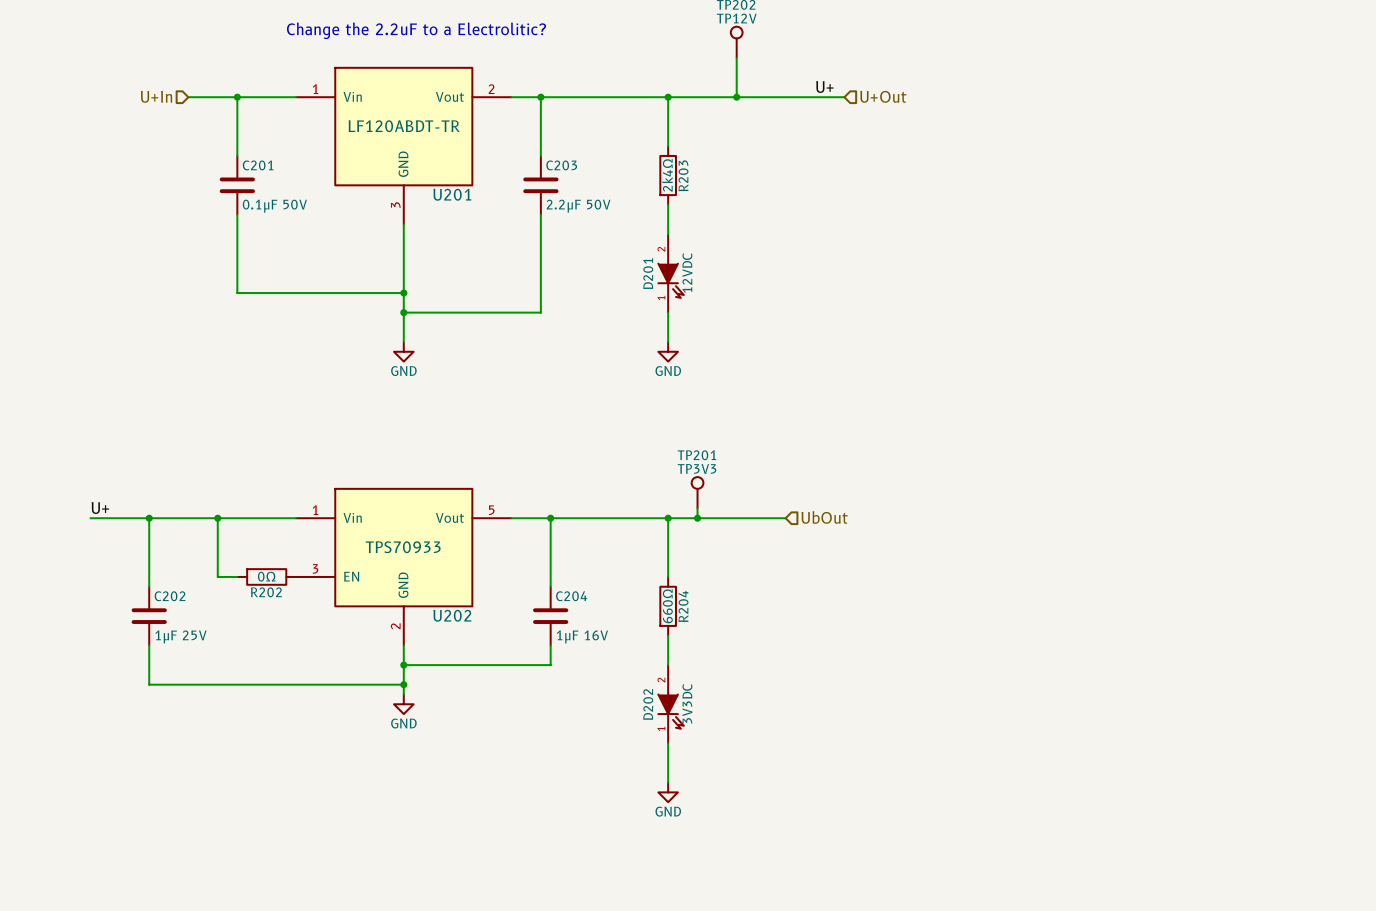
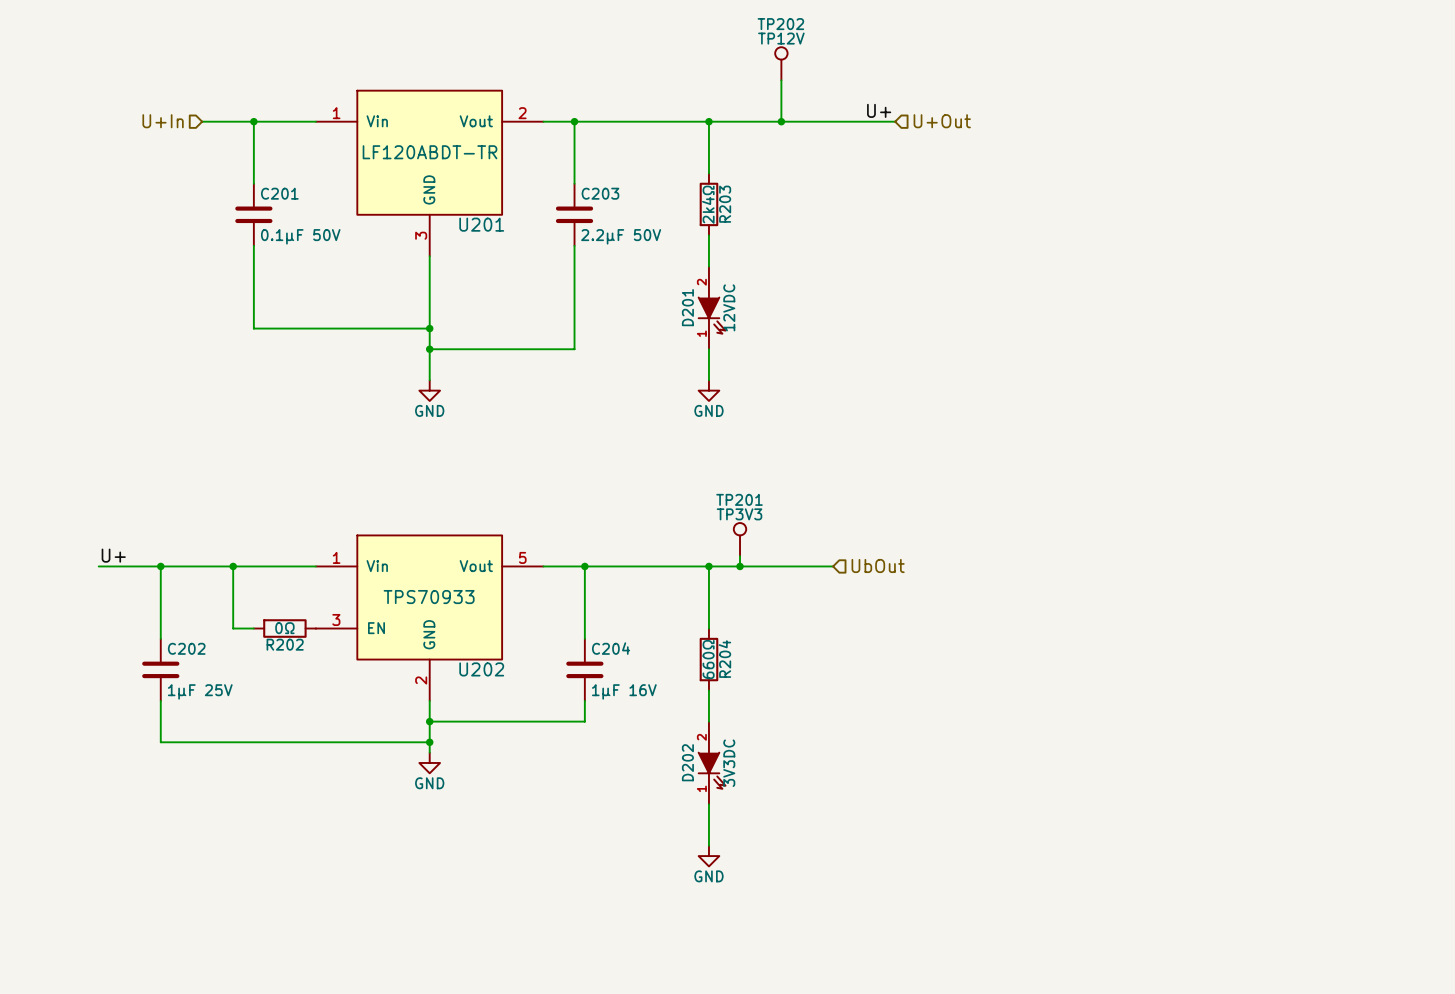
text: Change the 2.2uF to a Electrolitic? (416, 30) -> none

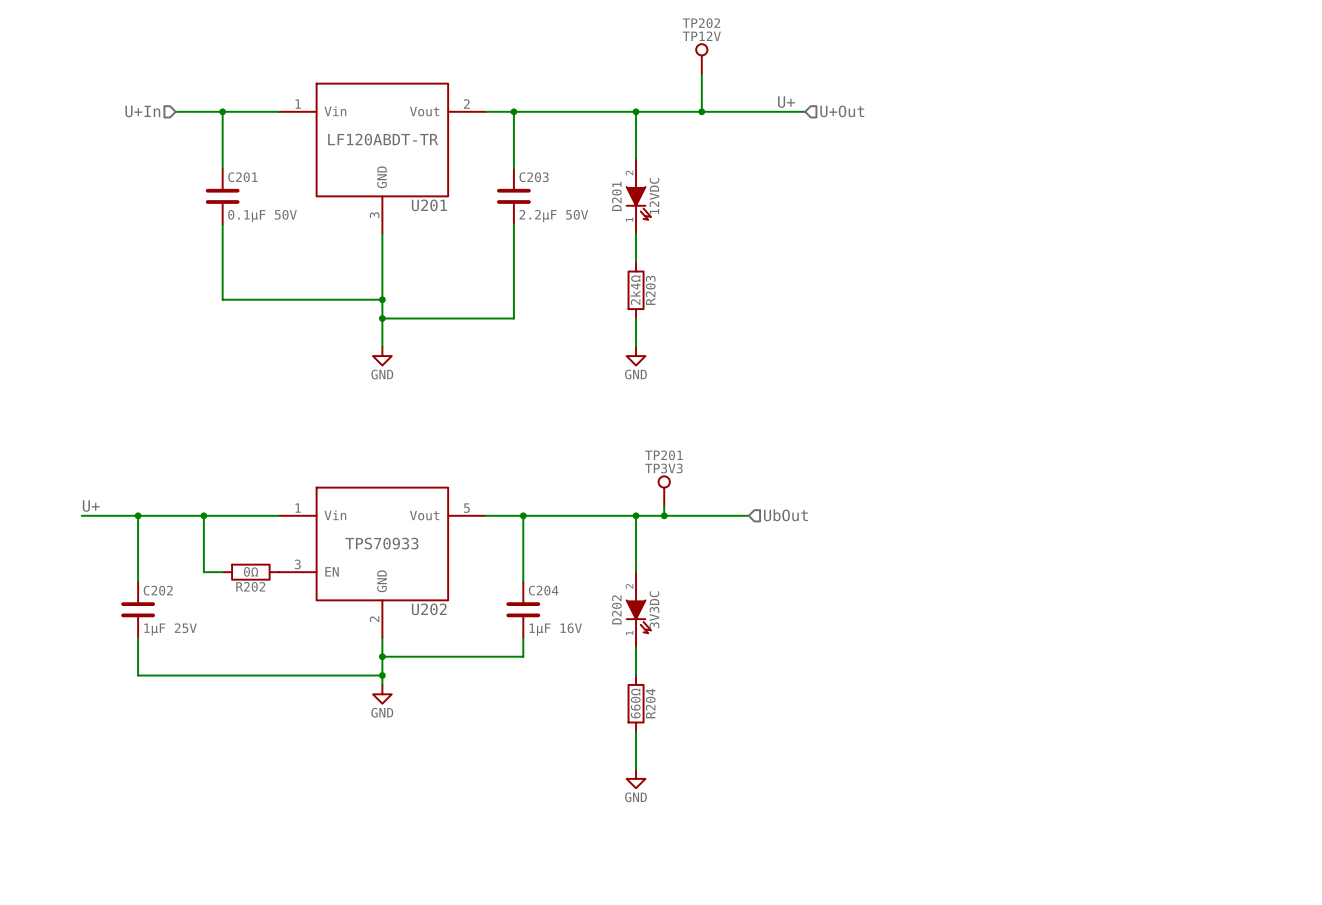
R203 position: (708, 204) -> (636, 290)
D201 position: (712, 307) -> (638, 196)
R204 position: (708, 659) -> (636, 703)
D202 position: (712, 762) -> (638, 609)

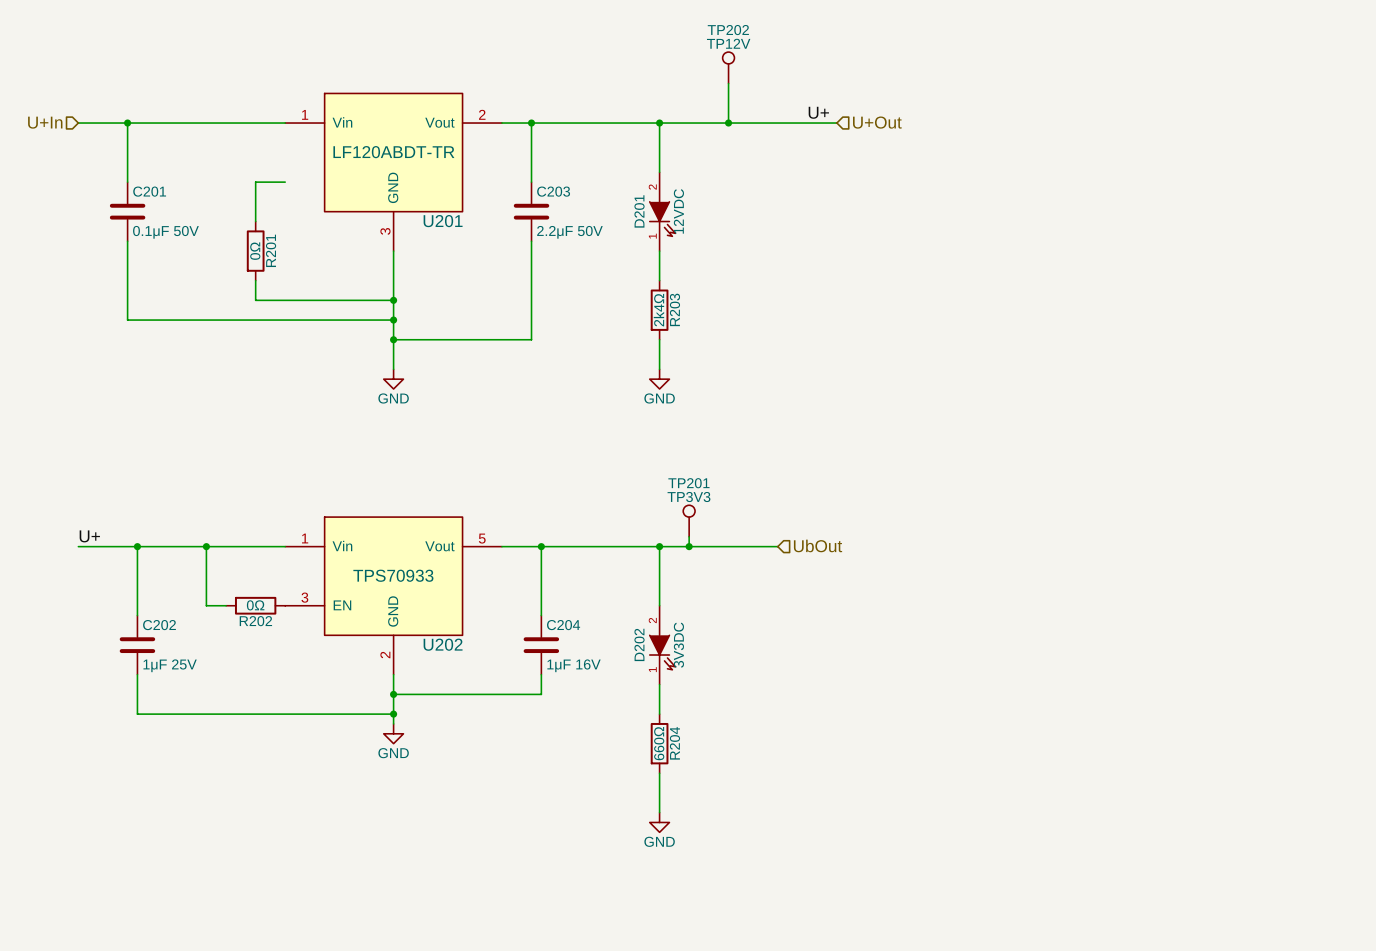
wire: none -> (78, 123) (176, 123)
junction: none -> (127, 123)
hierarchical label position: U+In (142, 111) -> U+In (45, 122)
wire: (222, 111) (222, 168) -> (127, 123) (127, 182)
junction: (222, 111) -> none
wire: none -> (285, 182) (255, 182) (255, 221)
C201 position: (222, 196) -> (127, 211)
wire: (222, 224) (222, 299) -> (127, 241) (127, 320) (226, 320)
R201: none -> 0Ω (255, 251)
wire: none -> (255, 280) (255, 300) (393, 300)
junction: none -> (393, 300)

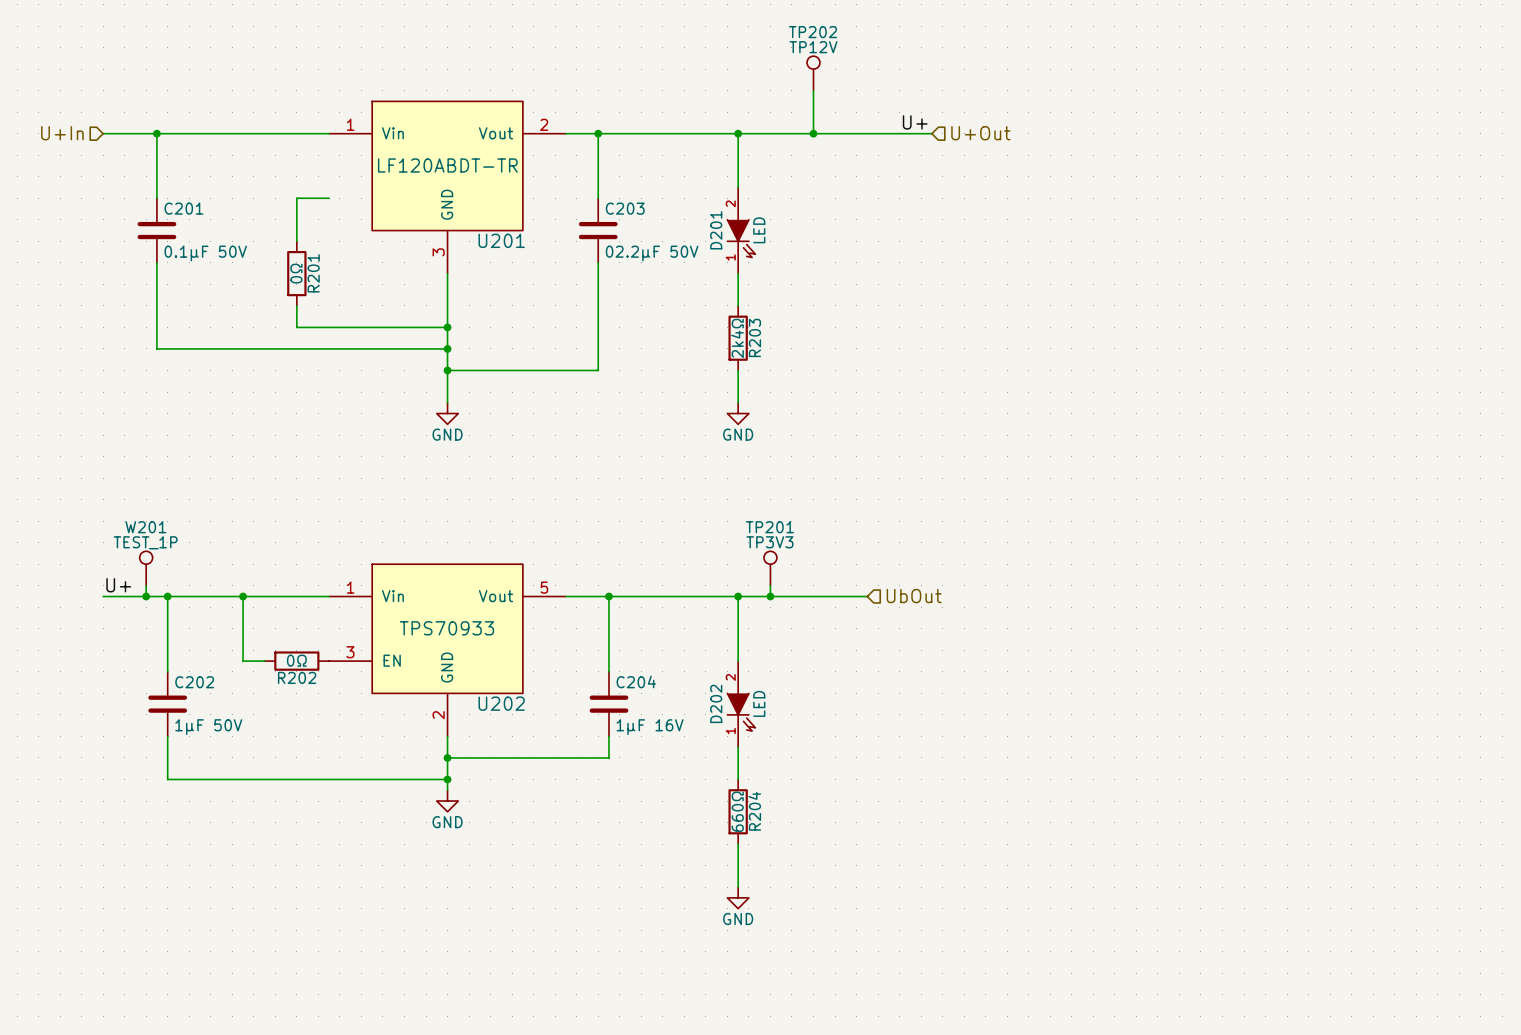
D201 value: 12VDC (678, 211) -> LED (759, 230)
C203 value: 2.2μF 50V (569, 232) -> 02.2μF 50V (652, 253)
W201: none -> TEST_1P (146, 568)
wire: none -> (146, 585) (146, 596)
junction: none -> (146, 596)
D202 value: 3V3DC (678, 645) -> LED (759, 703)
C202 value: 1μF 25V (170, 665) -> 1μF 50V (208, 727)

